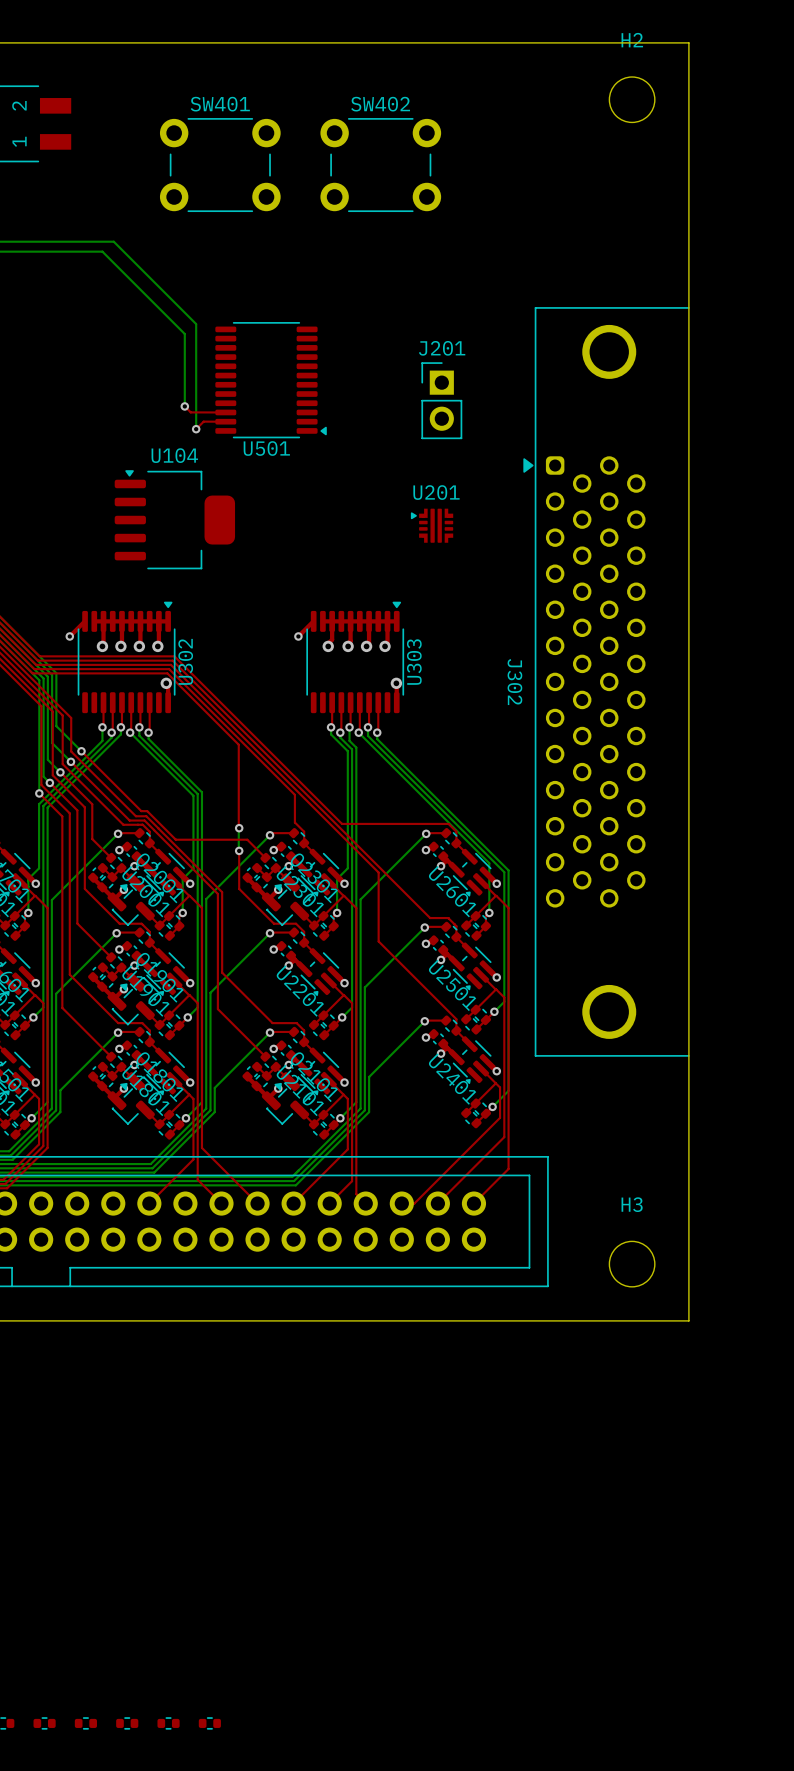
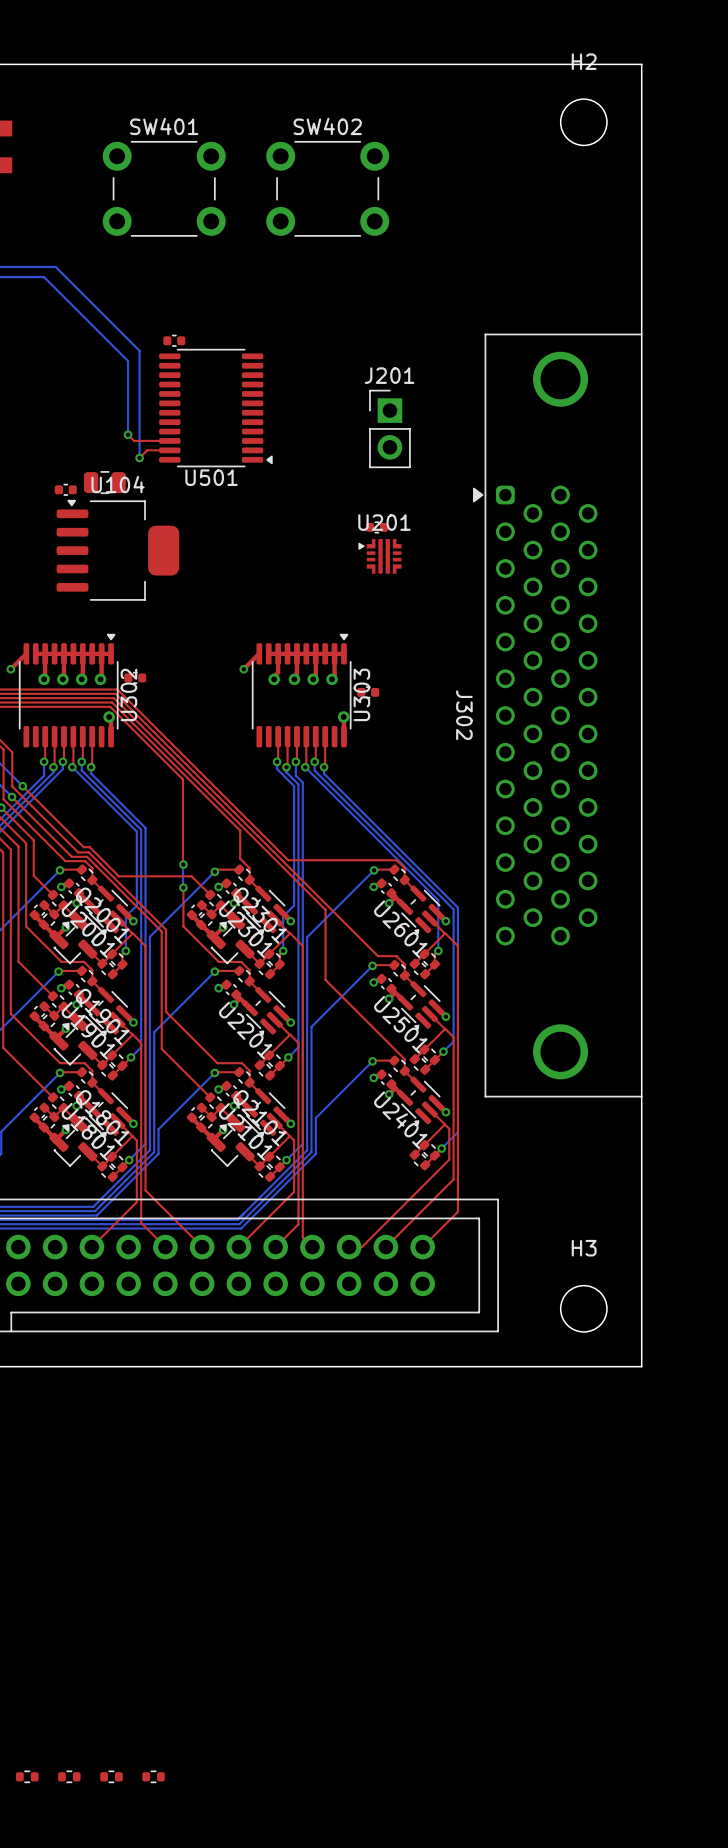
part: none -> (174, 340)
part: none -> (104, 482)
part: none -> (65, 489)
part: none -> (376, 527)
part: none -> (135, 677)
part: none -> (368, 692)

